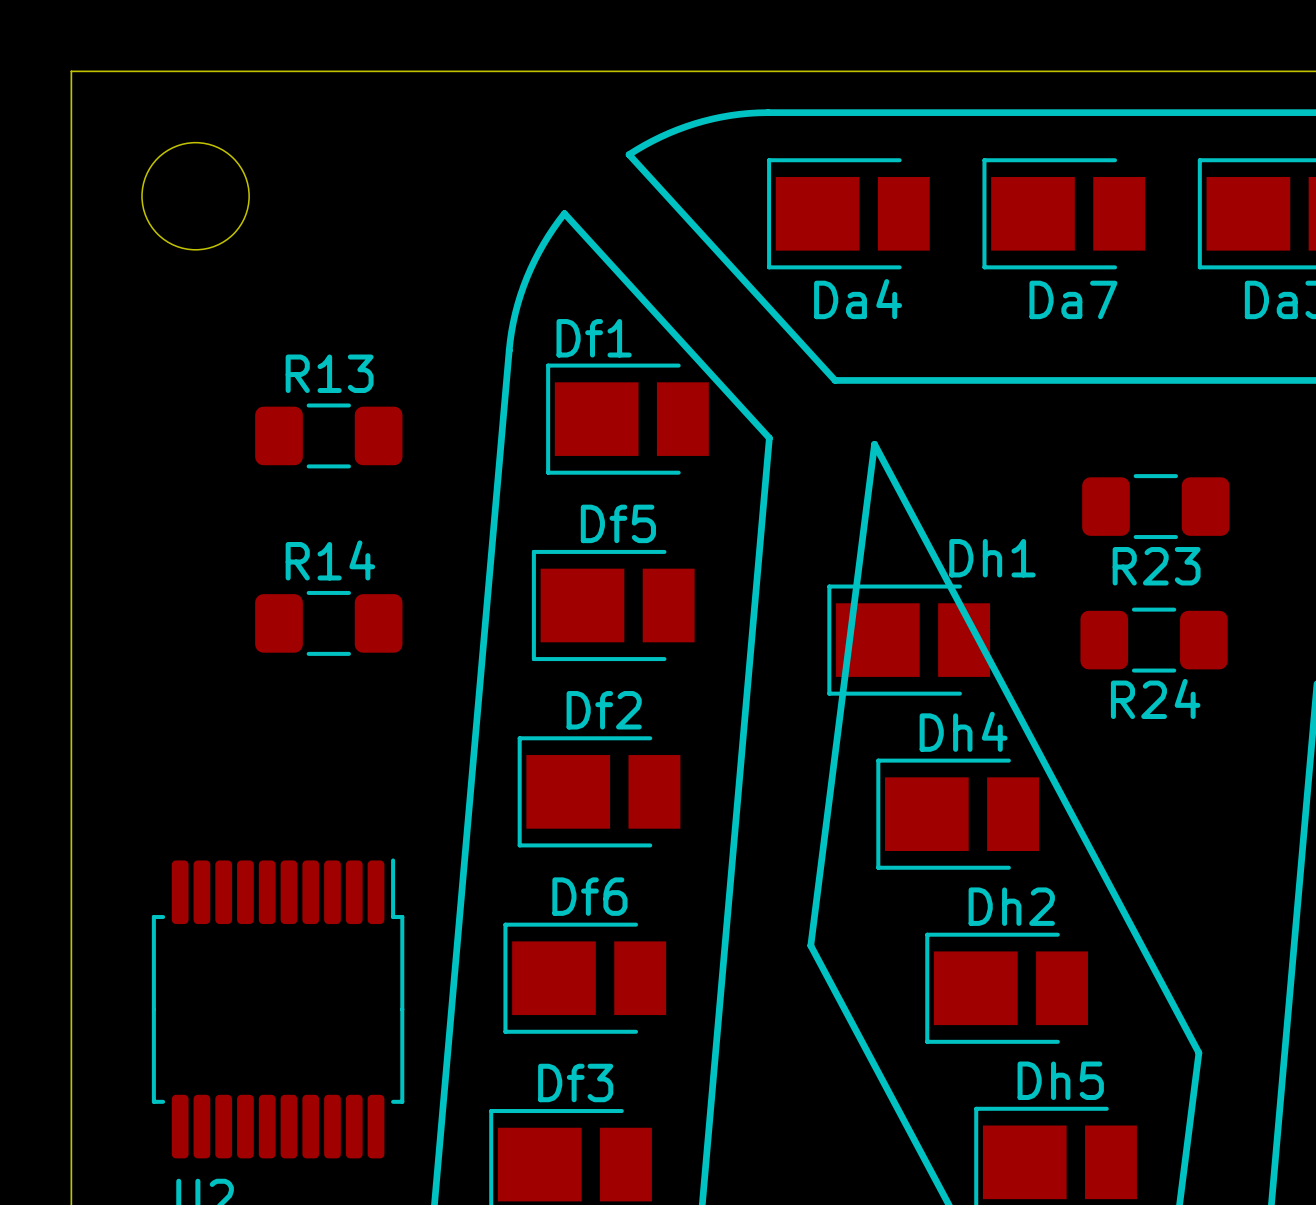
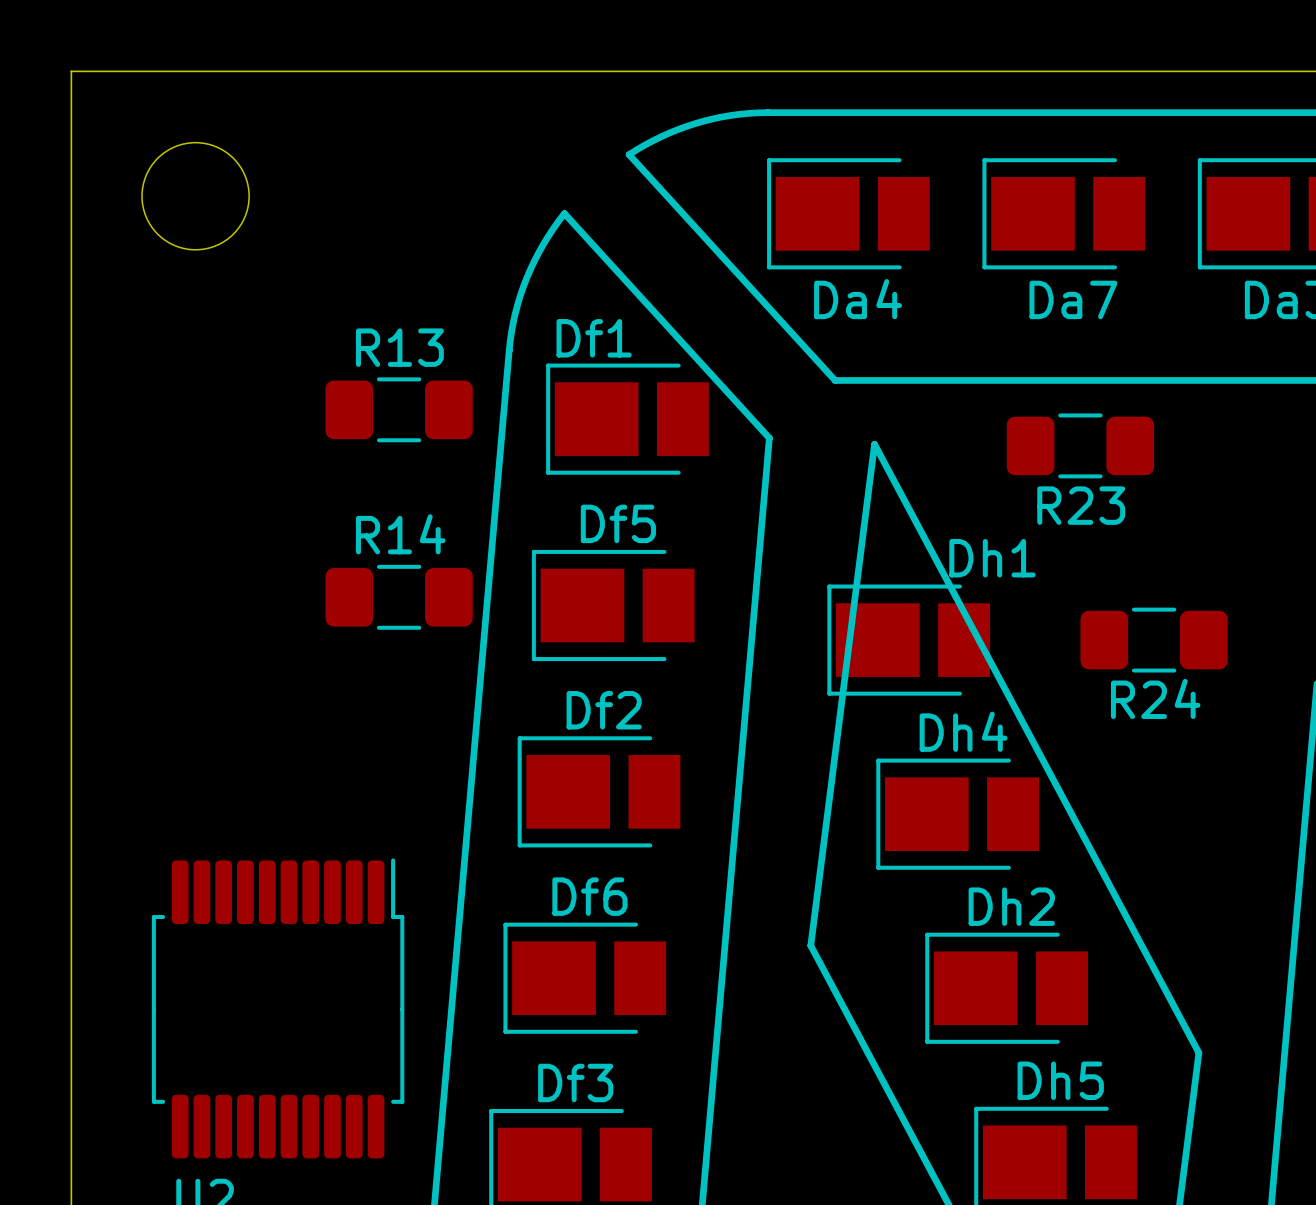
R13 position: (328, 435) -> (399, 409)
R23 position: (1155, 506) -> (1080, 445)
R14 position: (328, 623) -> (399, 597)

